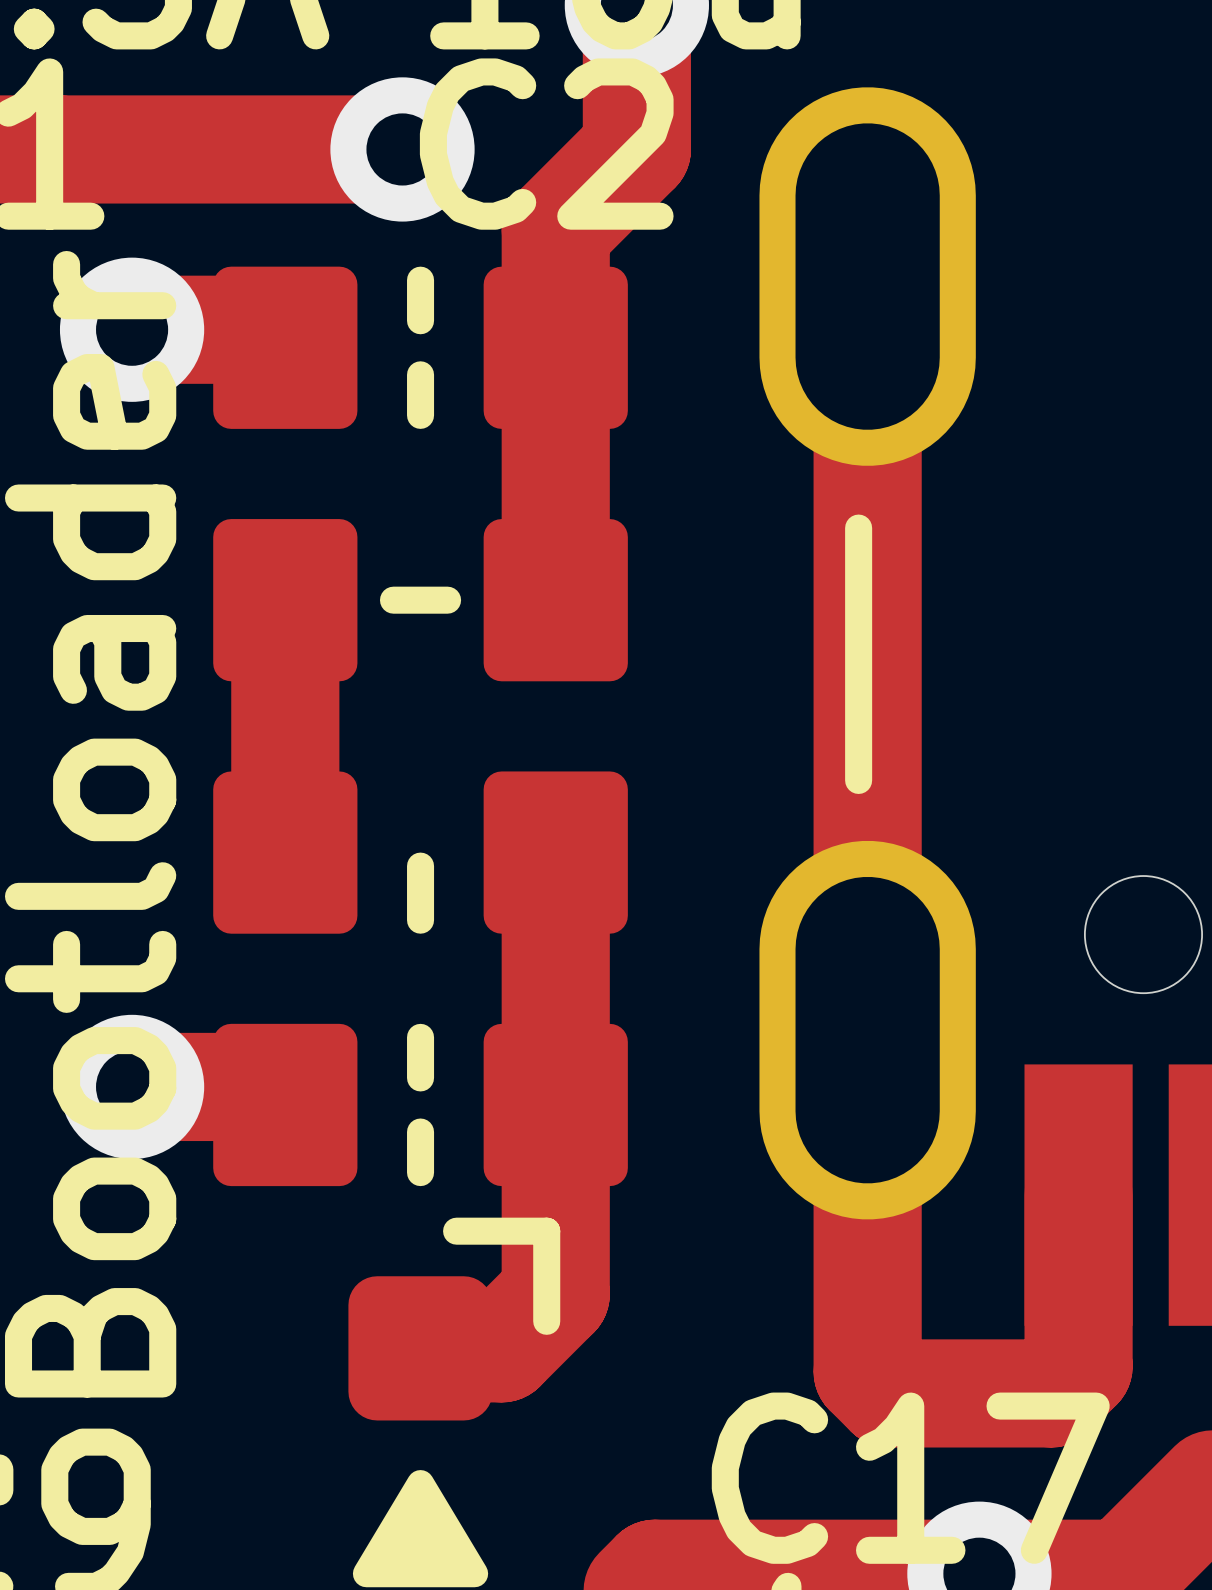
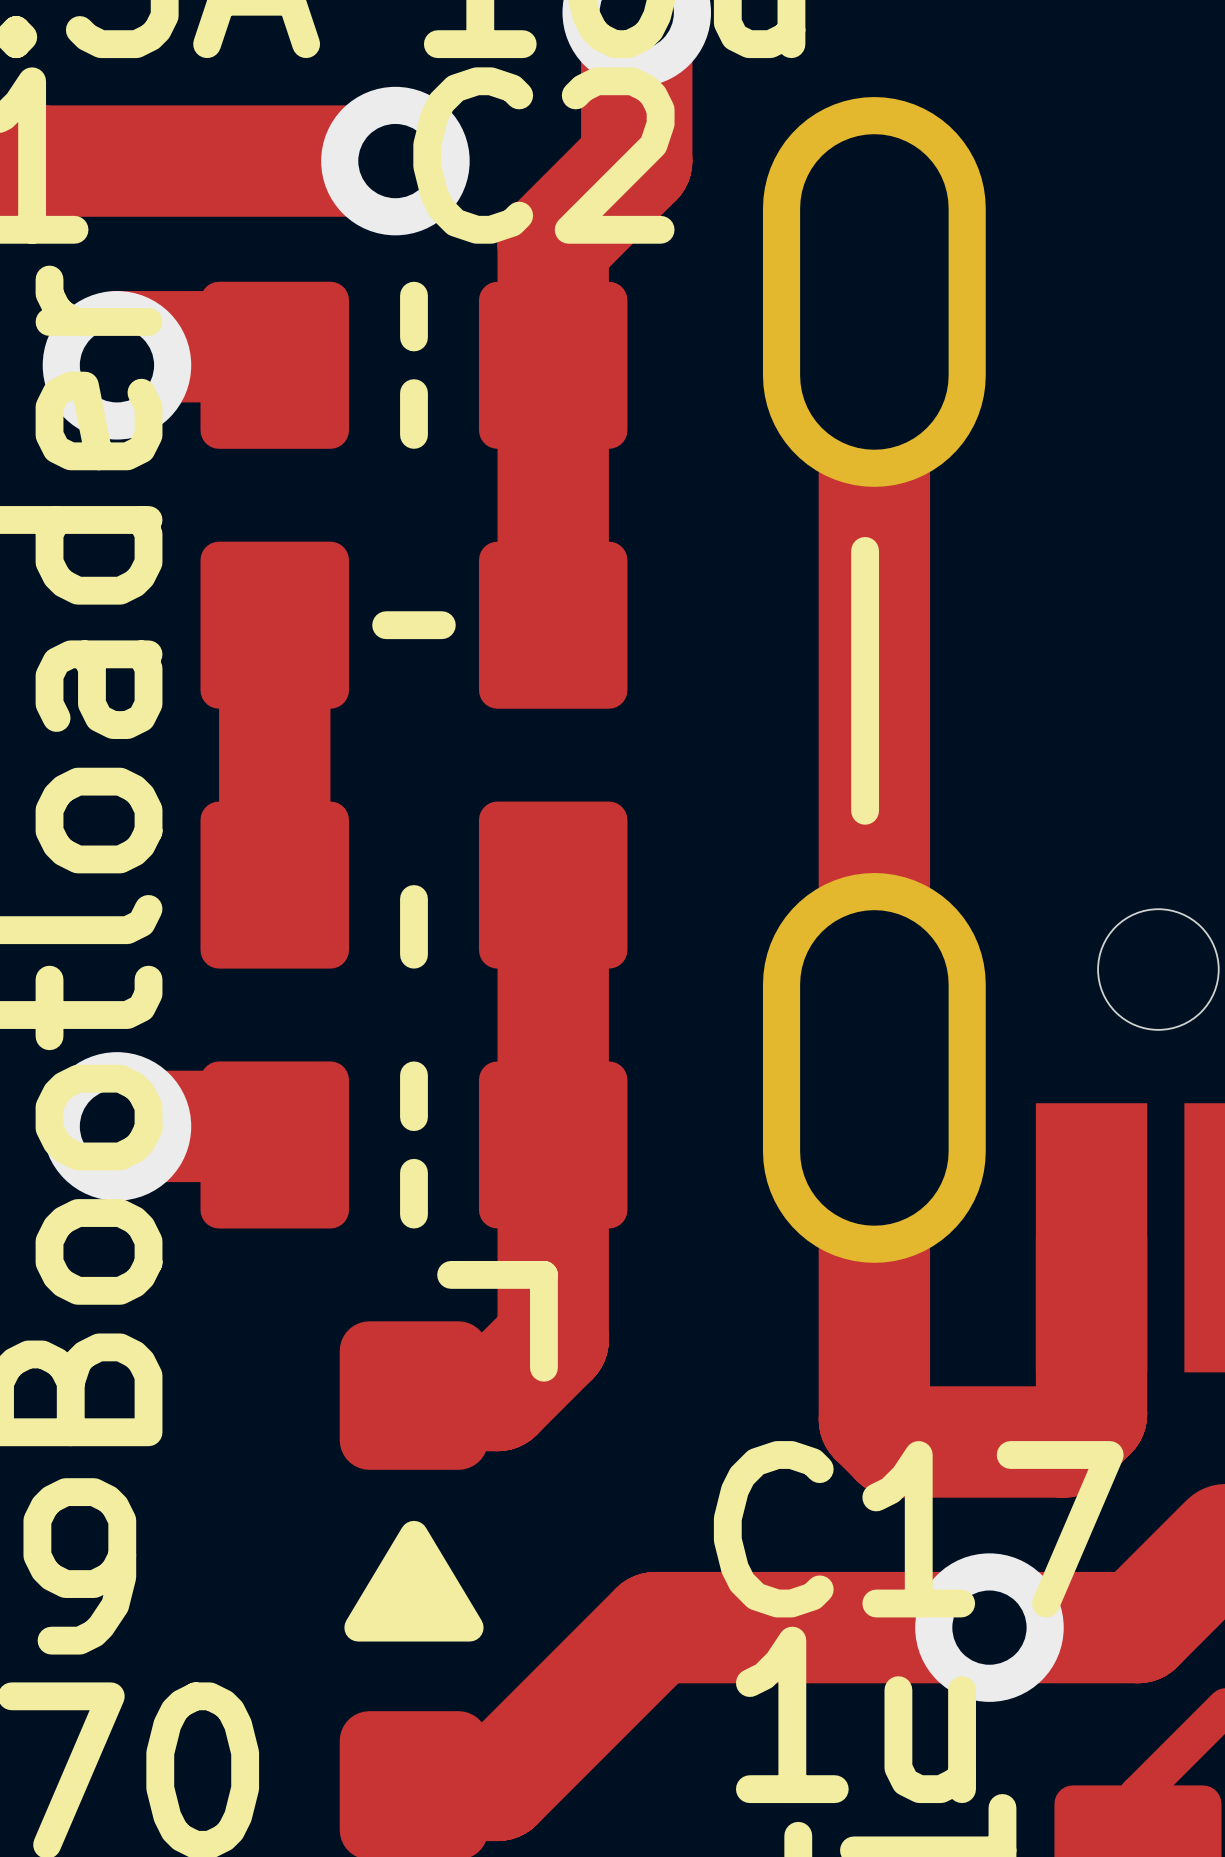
via position: (132, 329) -> (116, 365)

